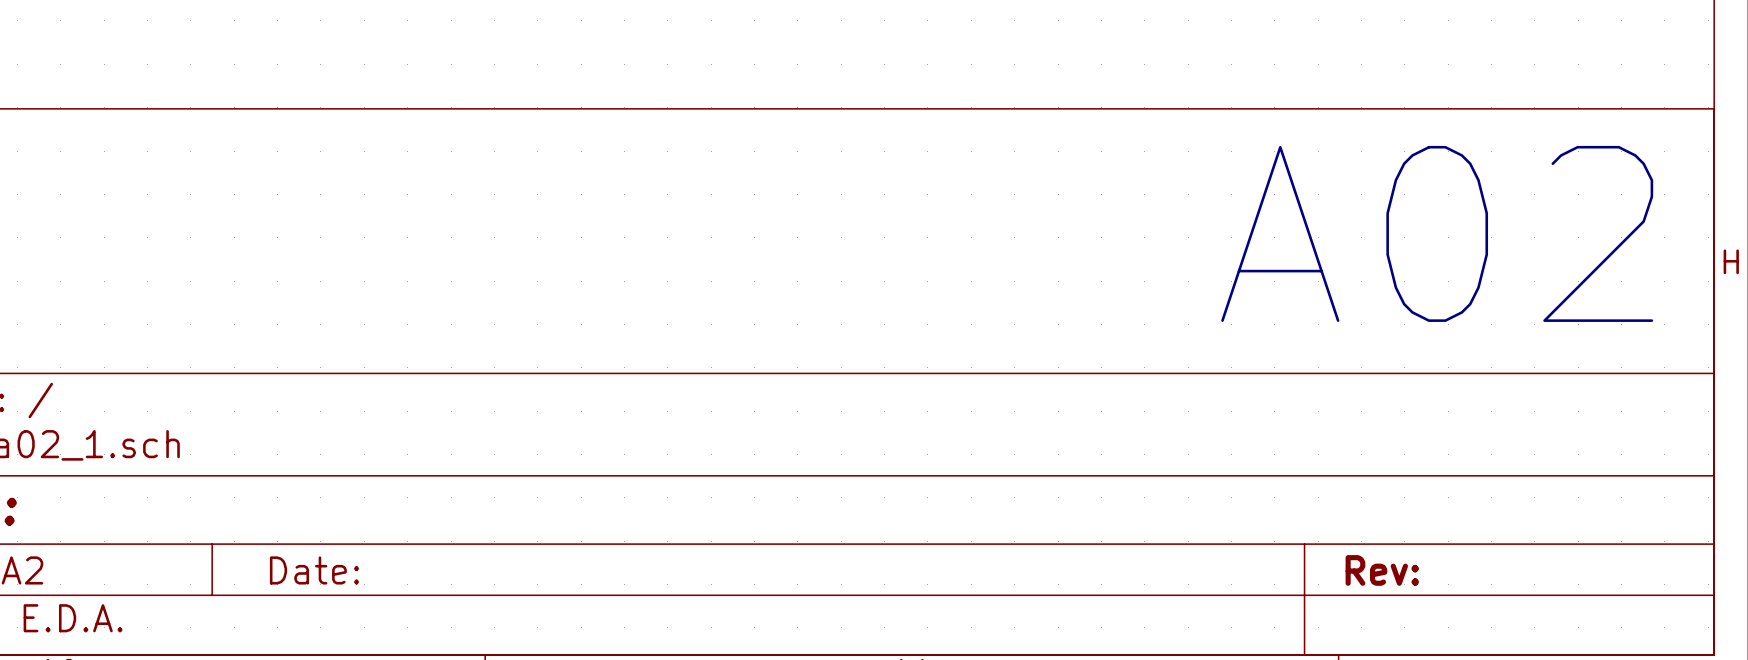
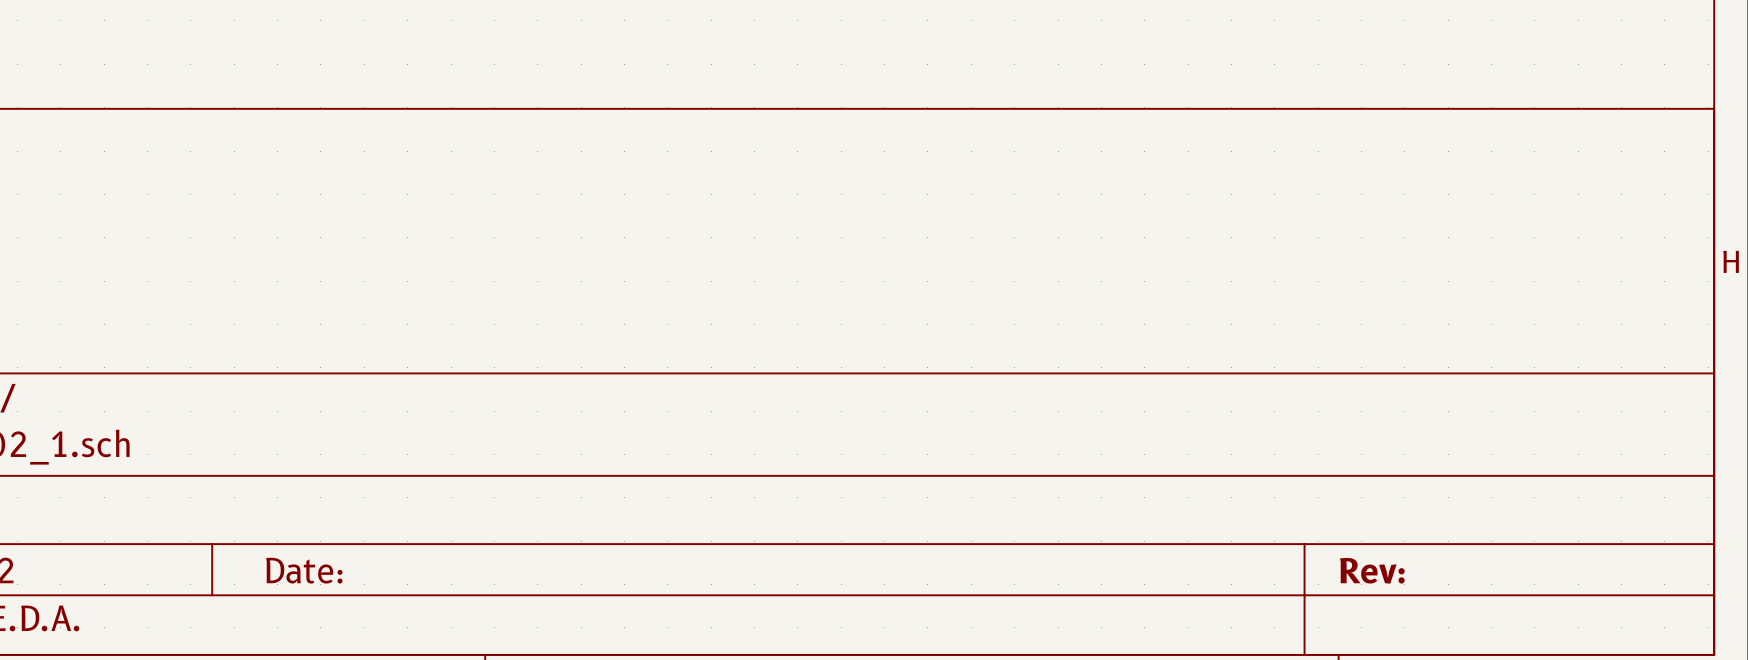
text: A02 (1437, 233) -> none

